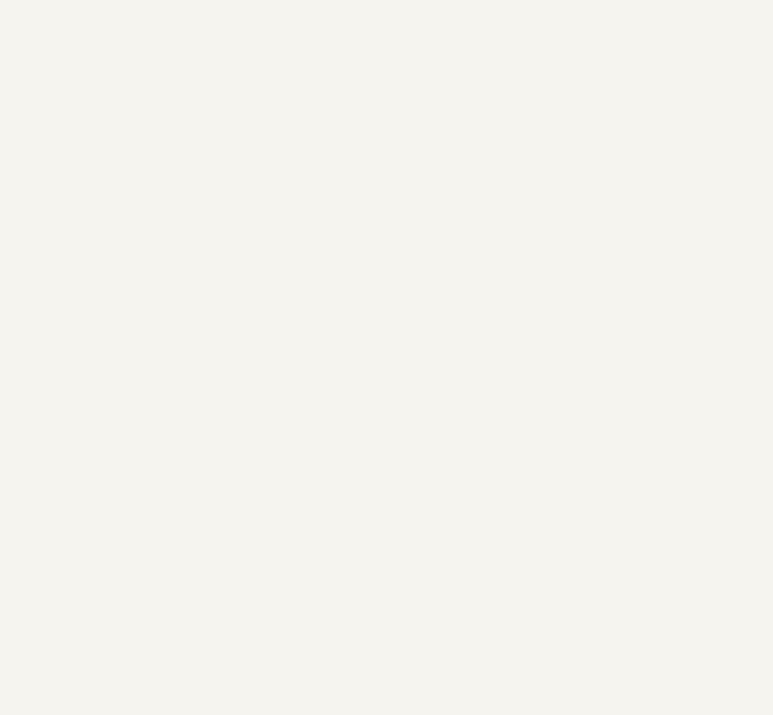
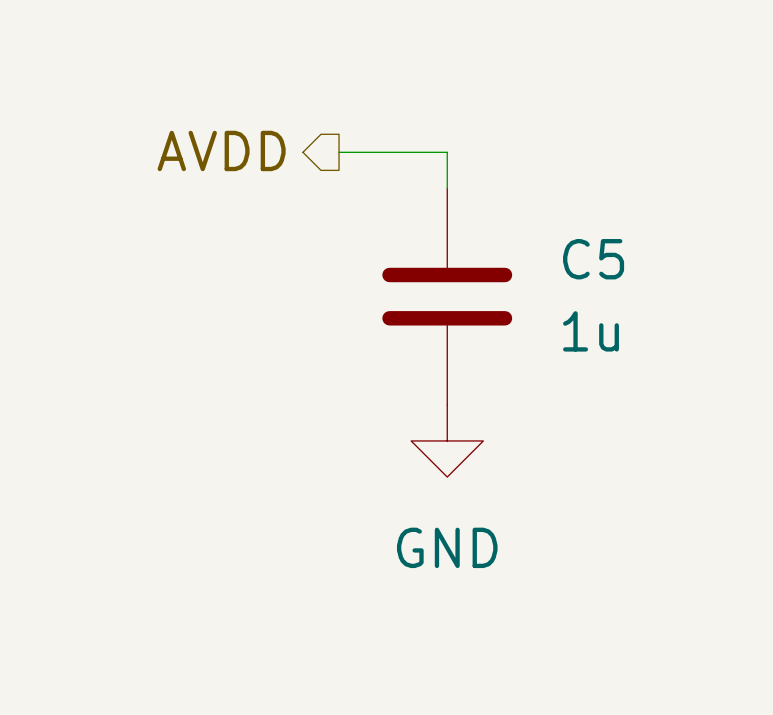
hierarchical label: none -> AVDD (221, 150)
wire: none -> (339, 152) (447, 152) (447, 188)
C5: none -> 1u (447, 296)
power symbol: none -> GND (447, 440)

